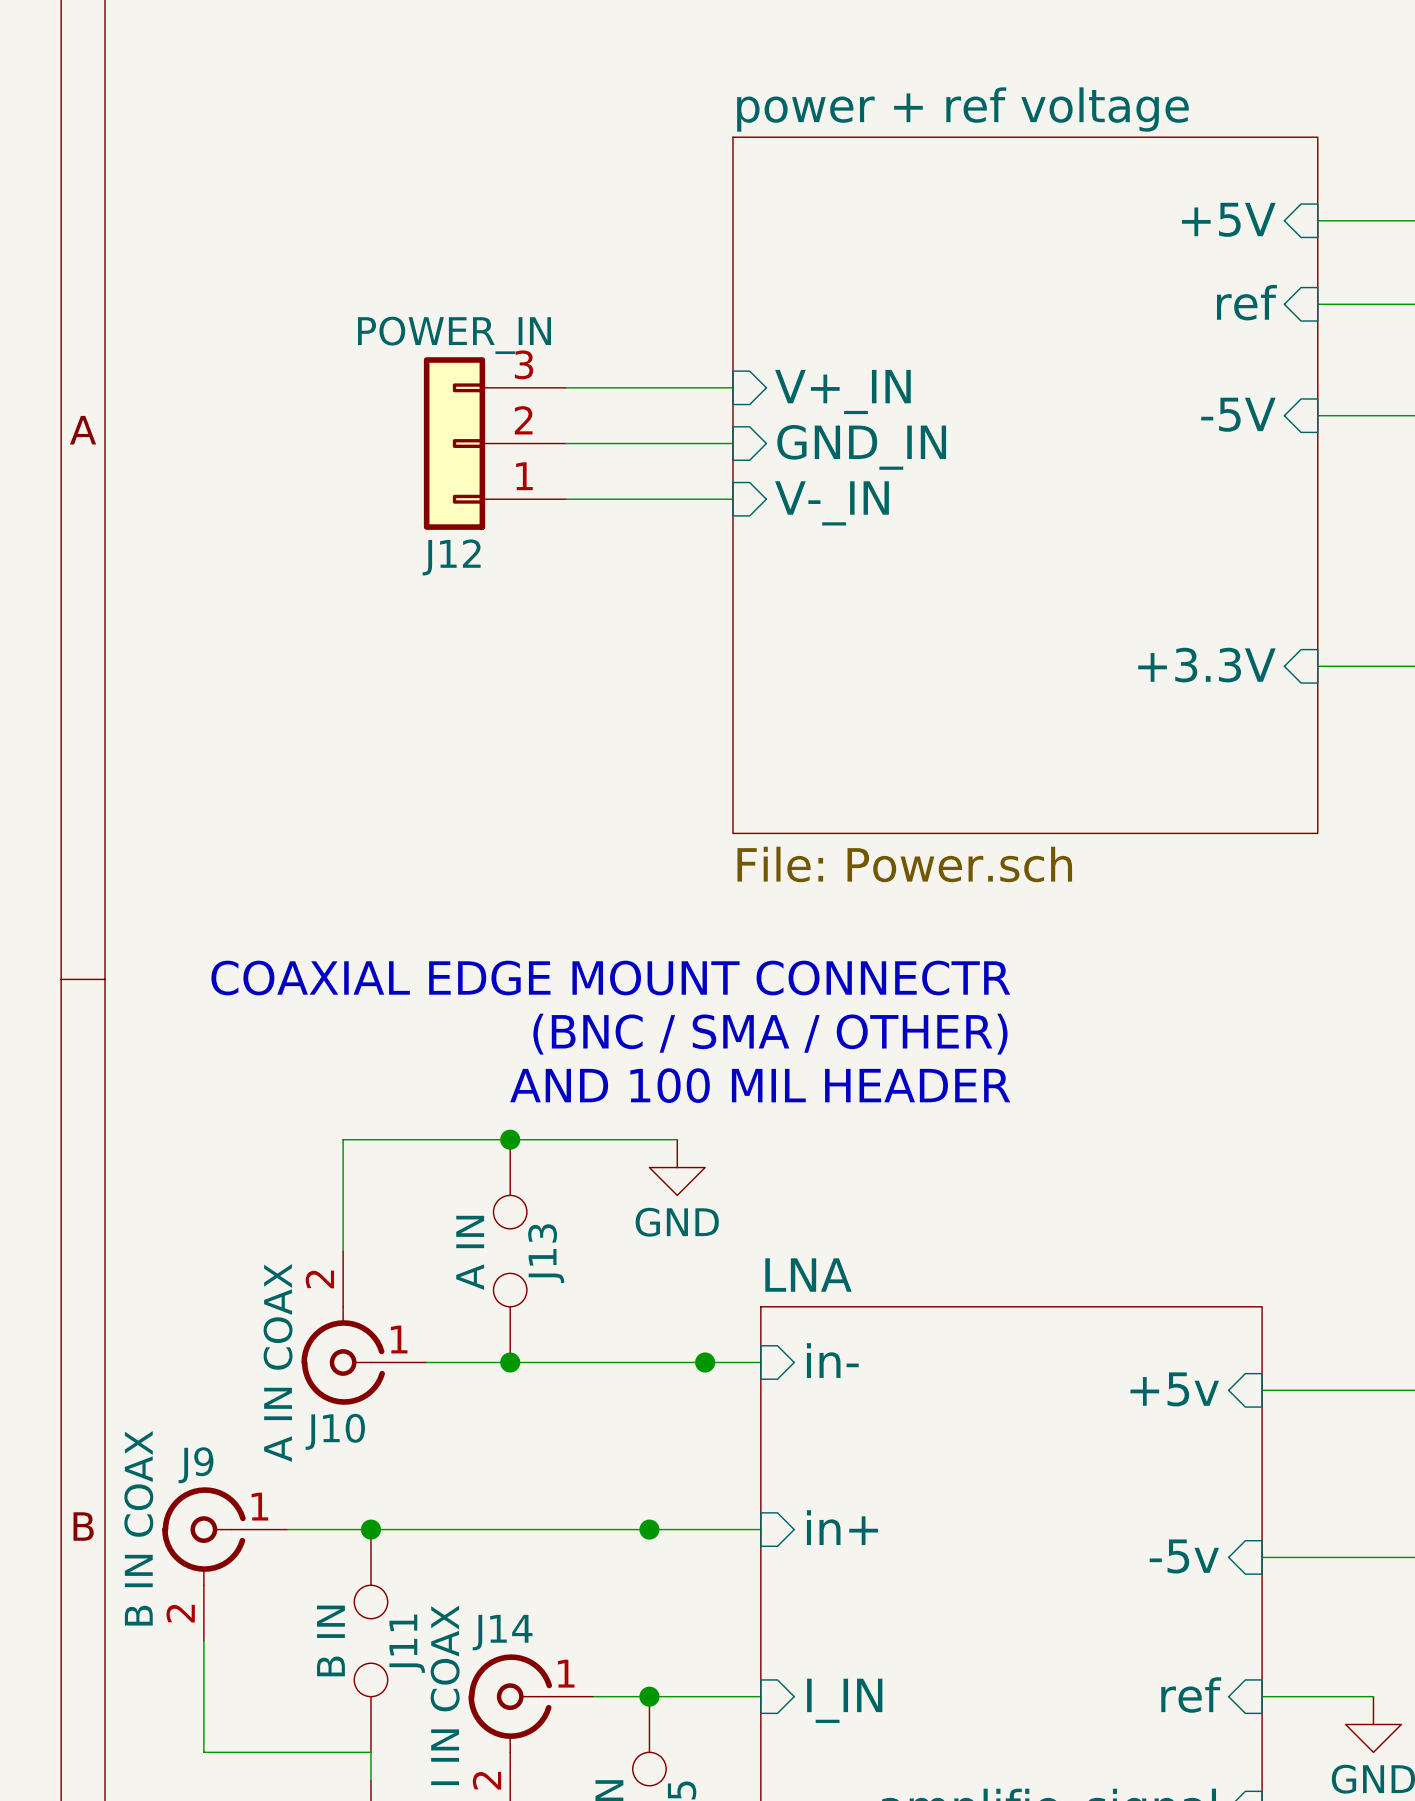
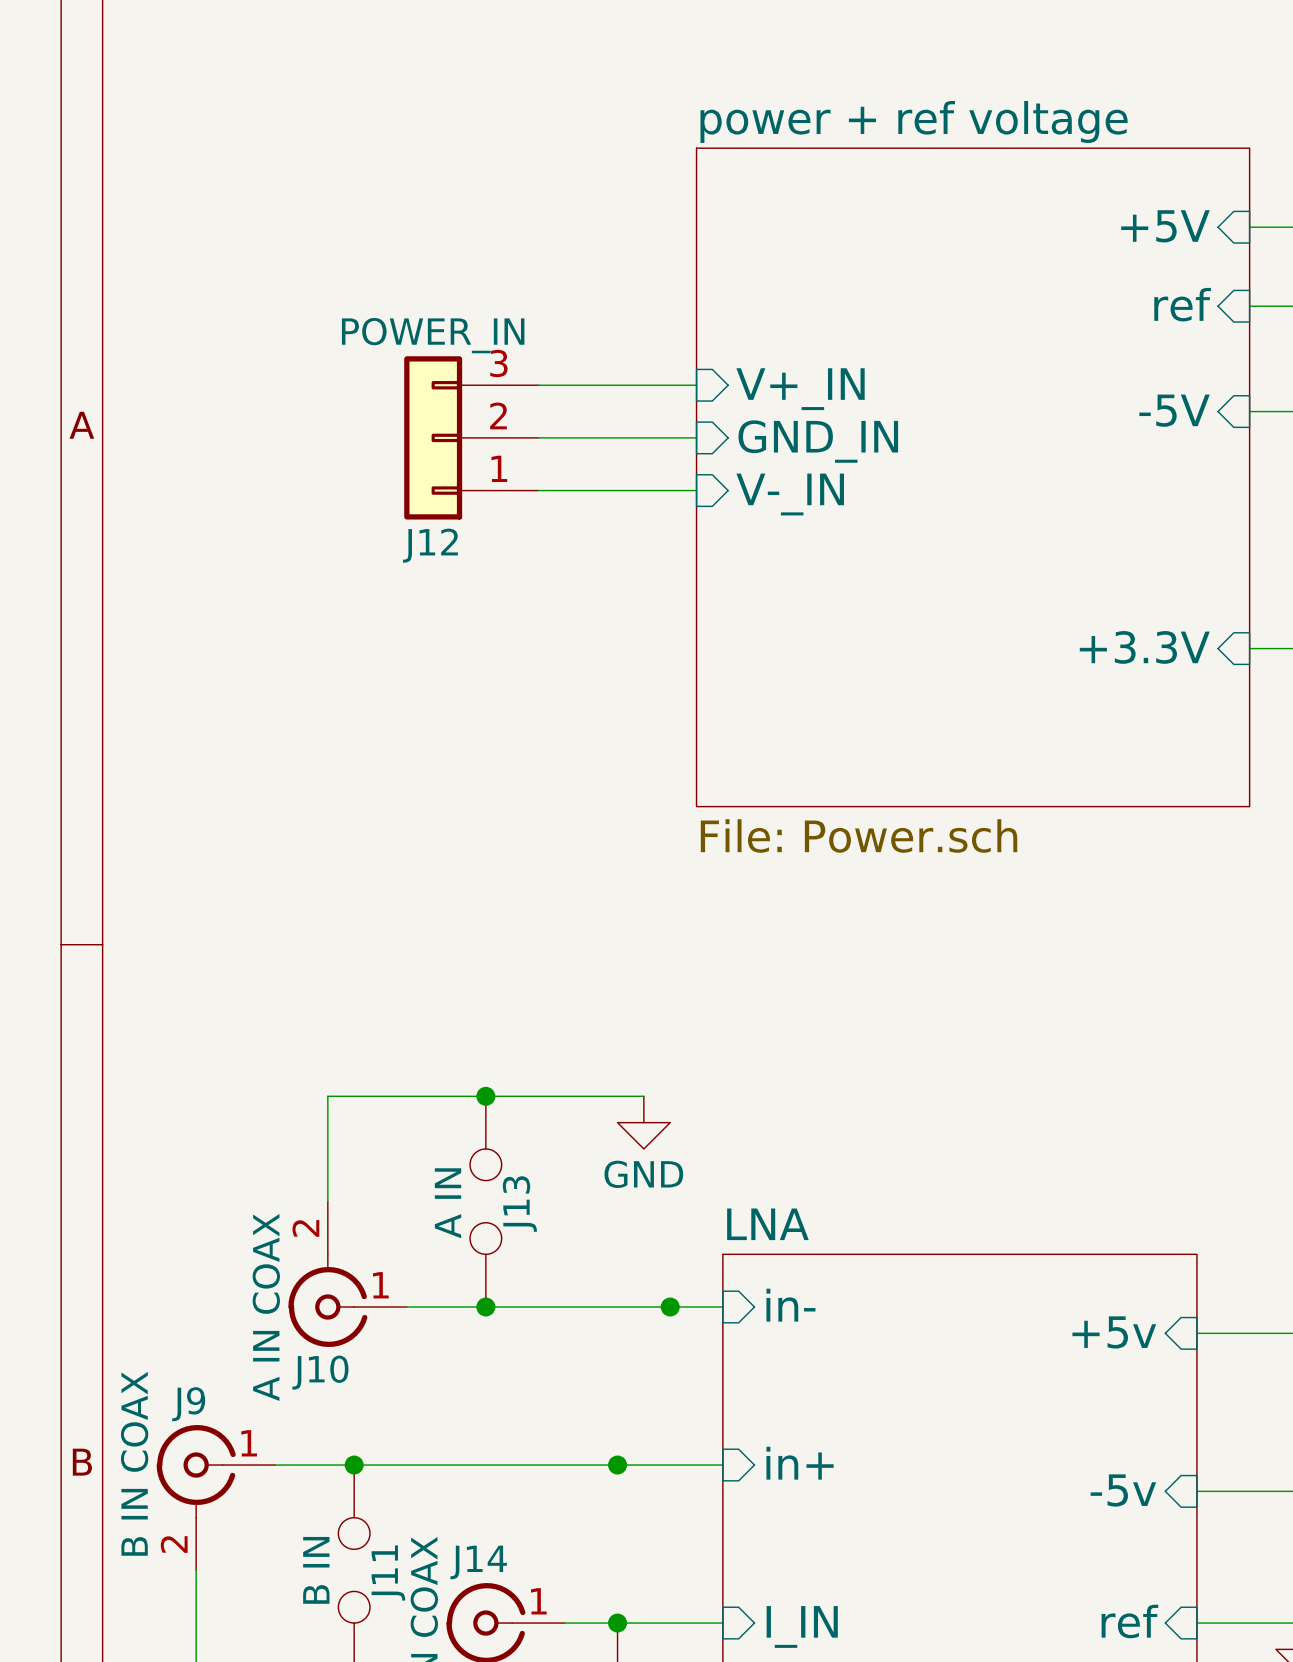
text: COAXIAL EDGE MOUNT CONNECTR (610, 978) -> none
text: (BNC / SMA / OTHER) (770, 1034) -> none
text: AND 100 MIL HEADER (760, 1085) -> none

